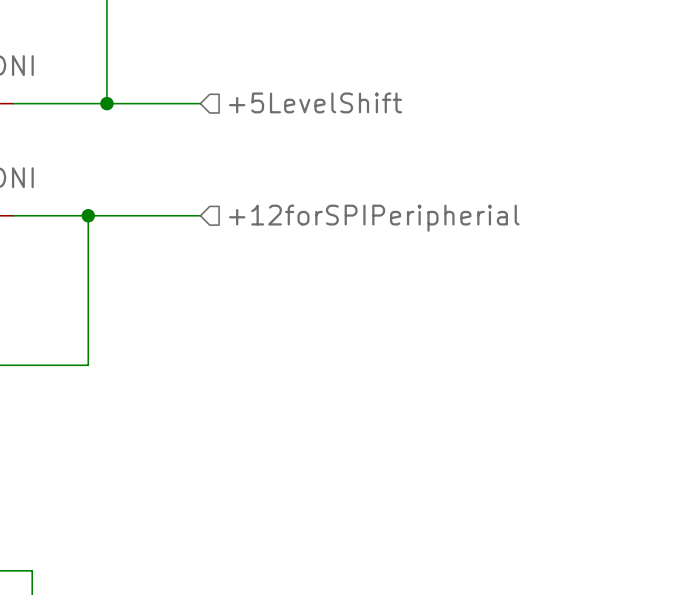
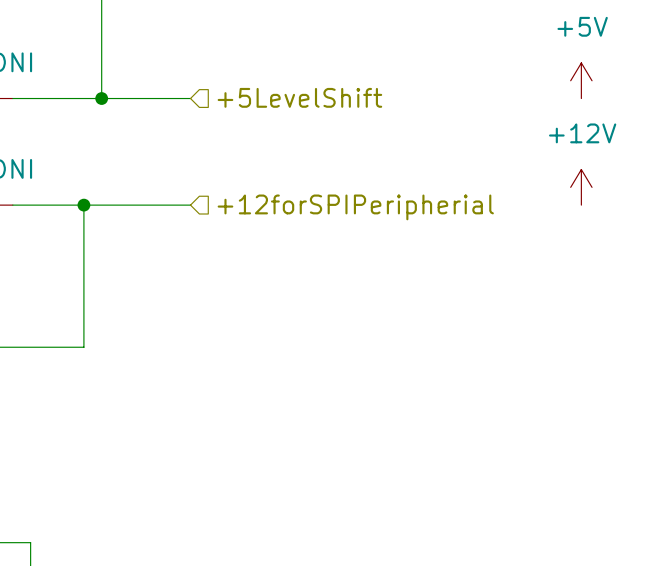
power symbol: none -> +5V (581, 80)
power symbol: none -> +12V (581, 187)

